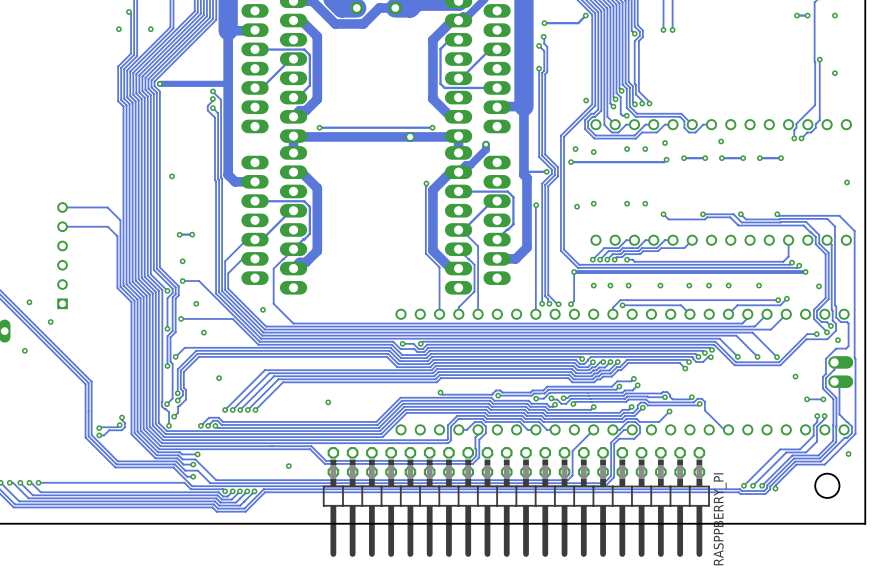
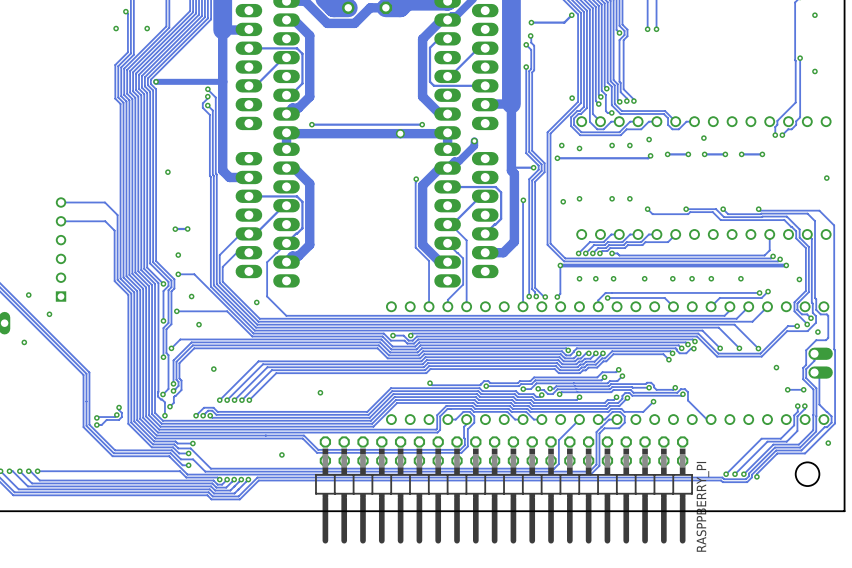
via: (797, 15) -> none
track: (807, 15) (797, 15) -> none
via: (807, 15) -> none

